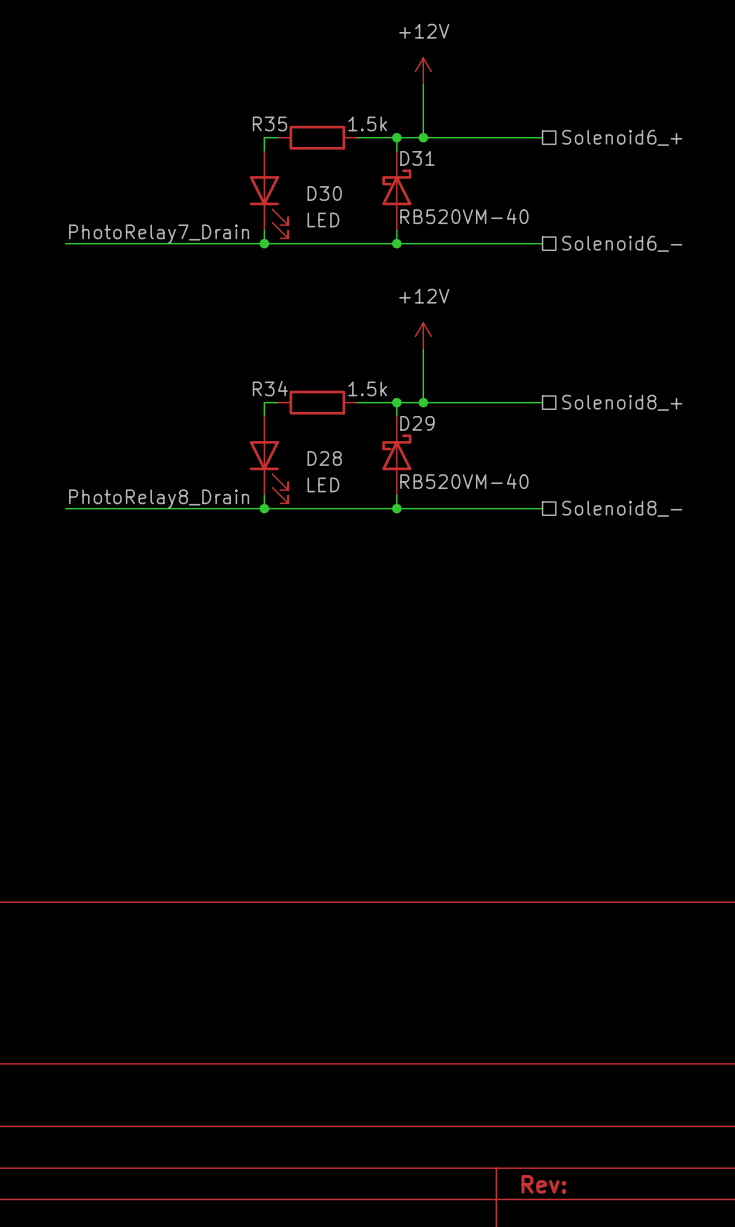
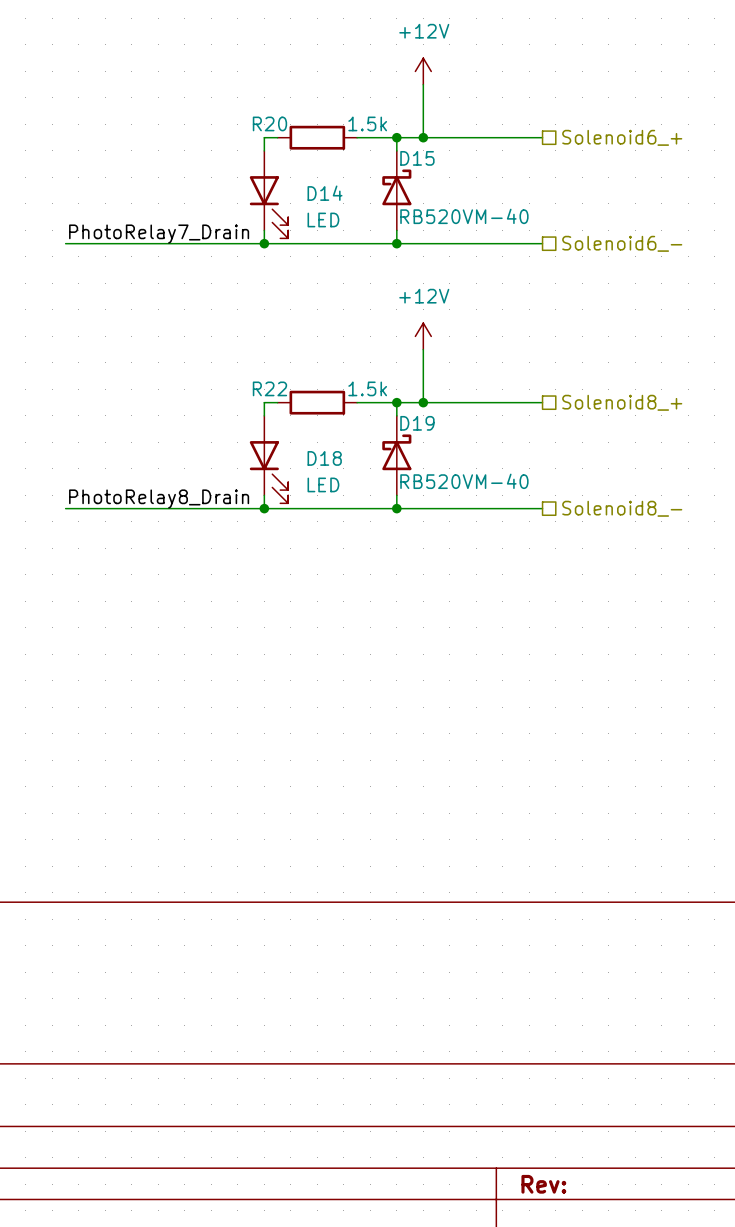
R35 name: R35 (269, 123) -> R20 (269, 123)
D31 name: D31 (417, 158) -> D15 (417, 158)
D30 name: D30 (324, 193) -> D14 (325, 193)
R34 name: R34 (270, 388) -> R22 (269, 388)
D29 name: D29 (417, 423) -> D19 (417, 423)
D28 name: D28 (324, 458) -> D18 (324, 458)

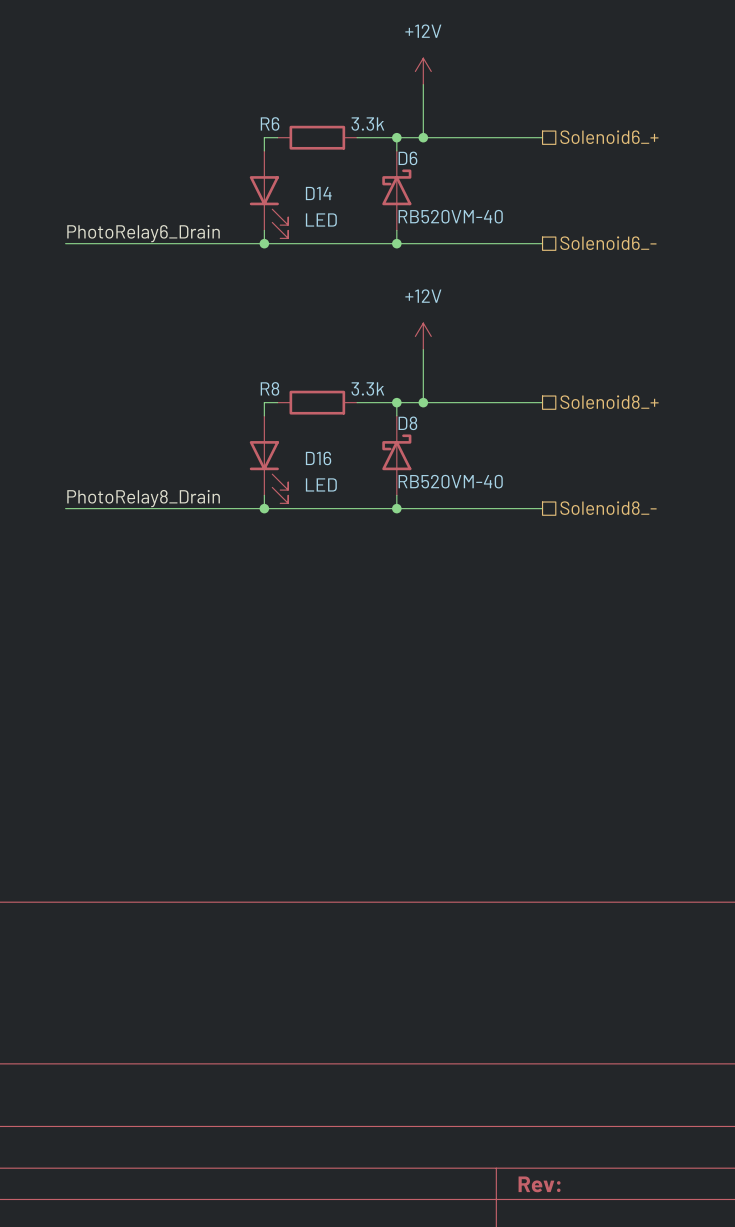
R20 name: R20 (269, 123) -> R6 (270, 123)
R20 value: 1.5k (367, 123) -> 3.3k (367, 124)
D15 name: D15 (417, 158) -> D6 (407, 158)
label: PhotoRelay7_Drain (159, 234) -> PhotoRelay6_Drain (143, 233)
R22 name: R22 (269, 388) -> R8 (269, 388)
R22 value: 1.5k (367, 388) -> 3.3k (367, 388)
D19 name: D19 (417, 423) -> D8 (407, 423)
D18 name: D18 (324, 458) -> D16 (318, 458)

